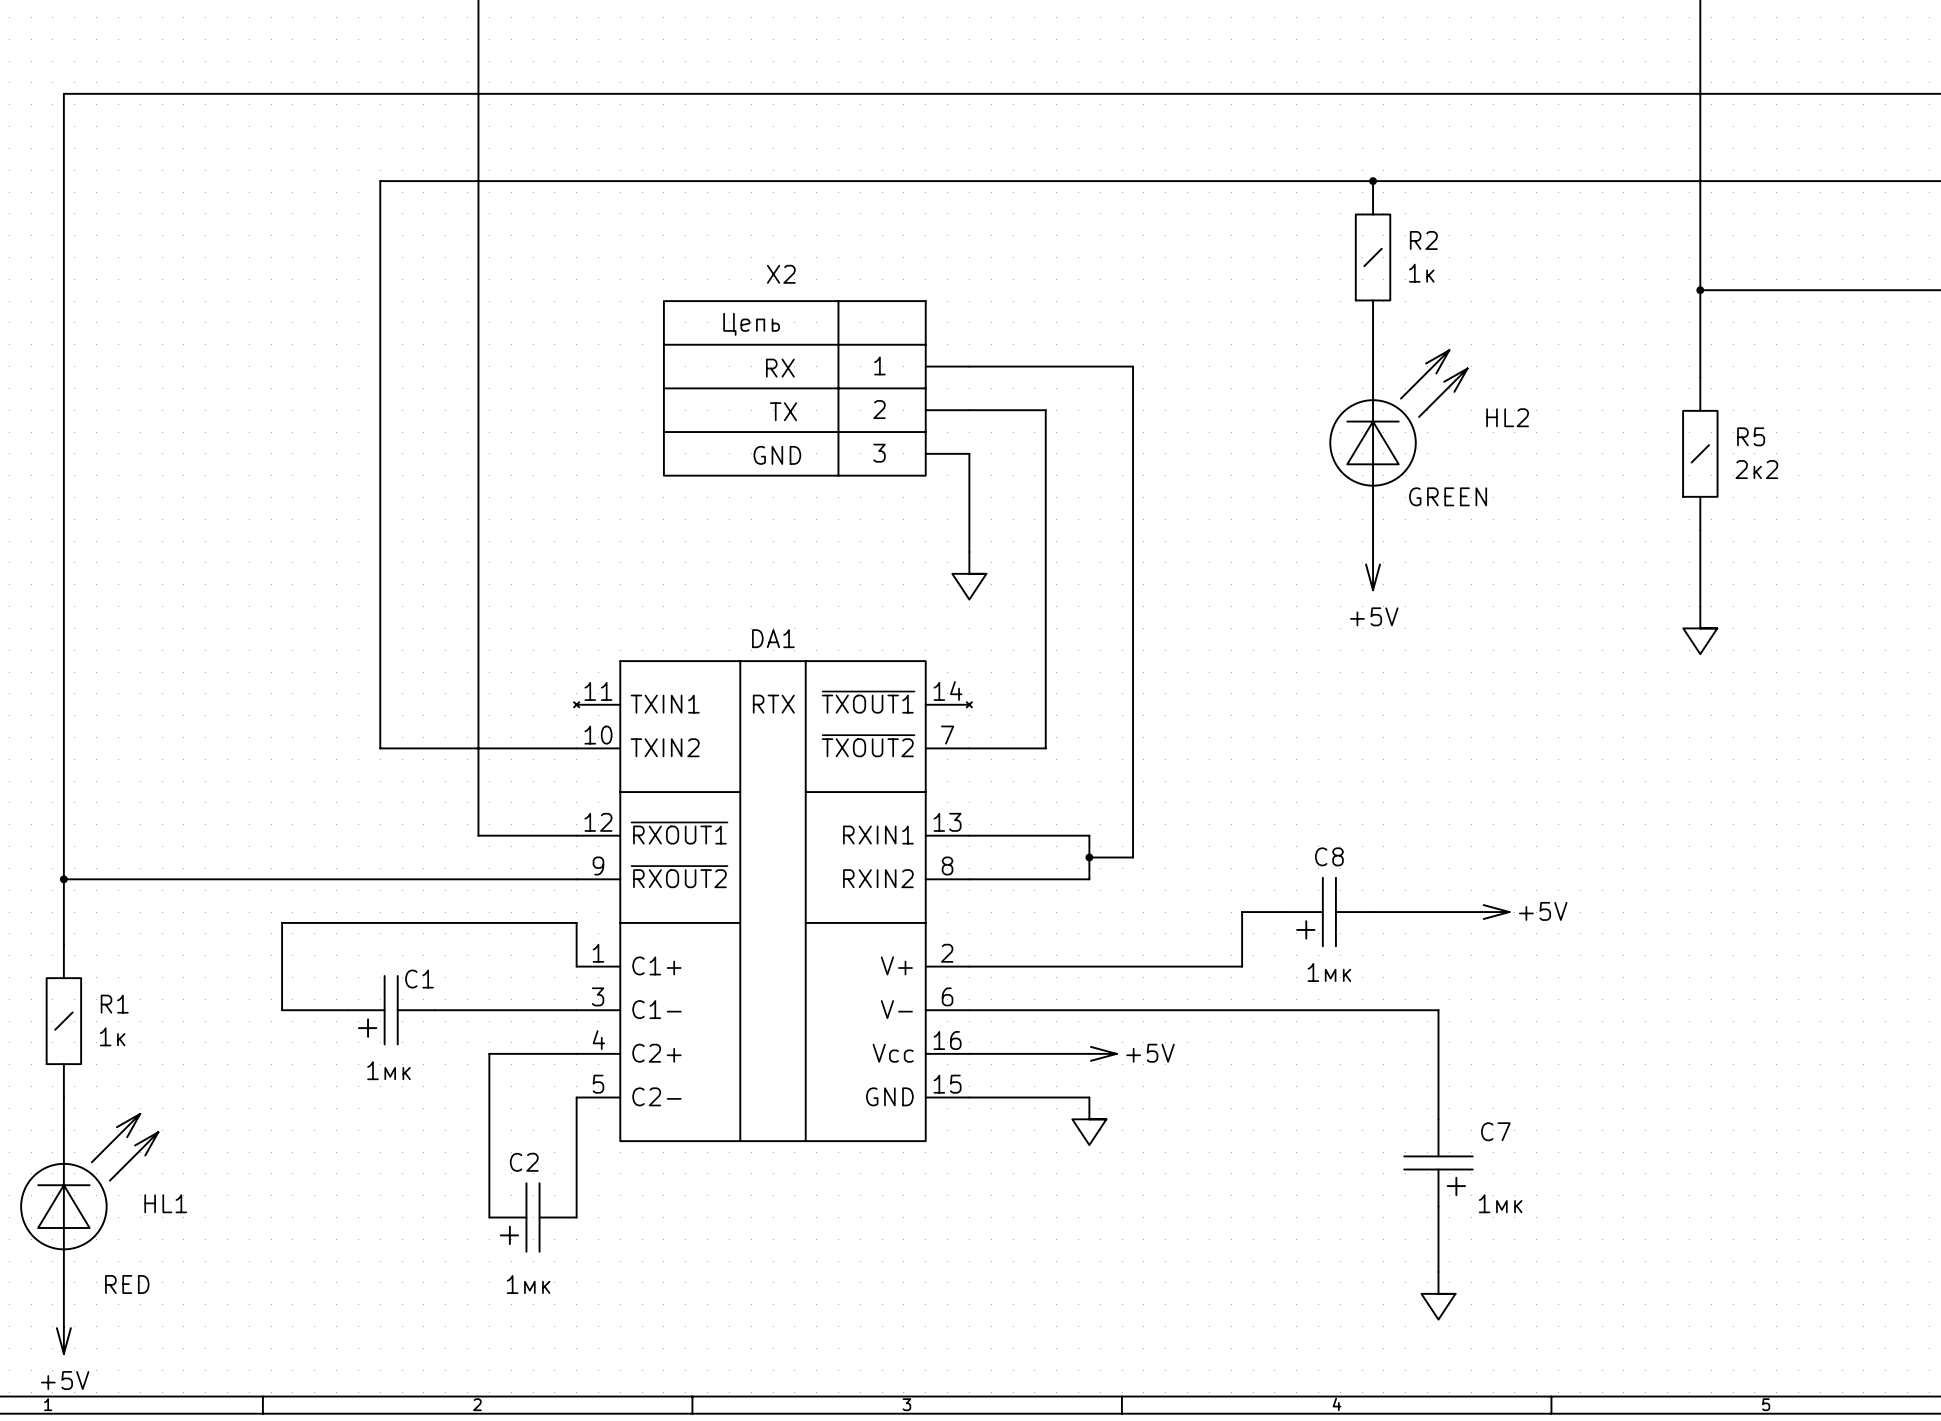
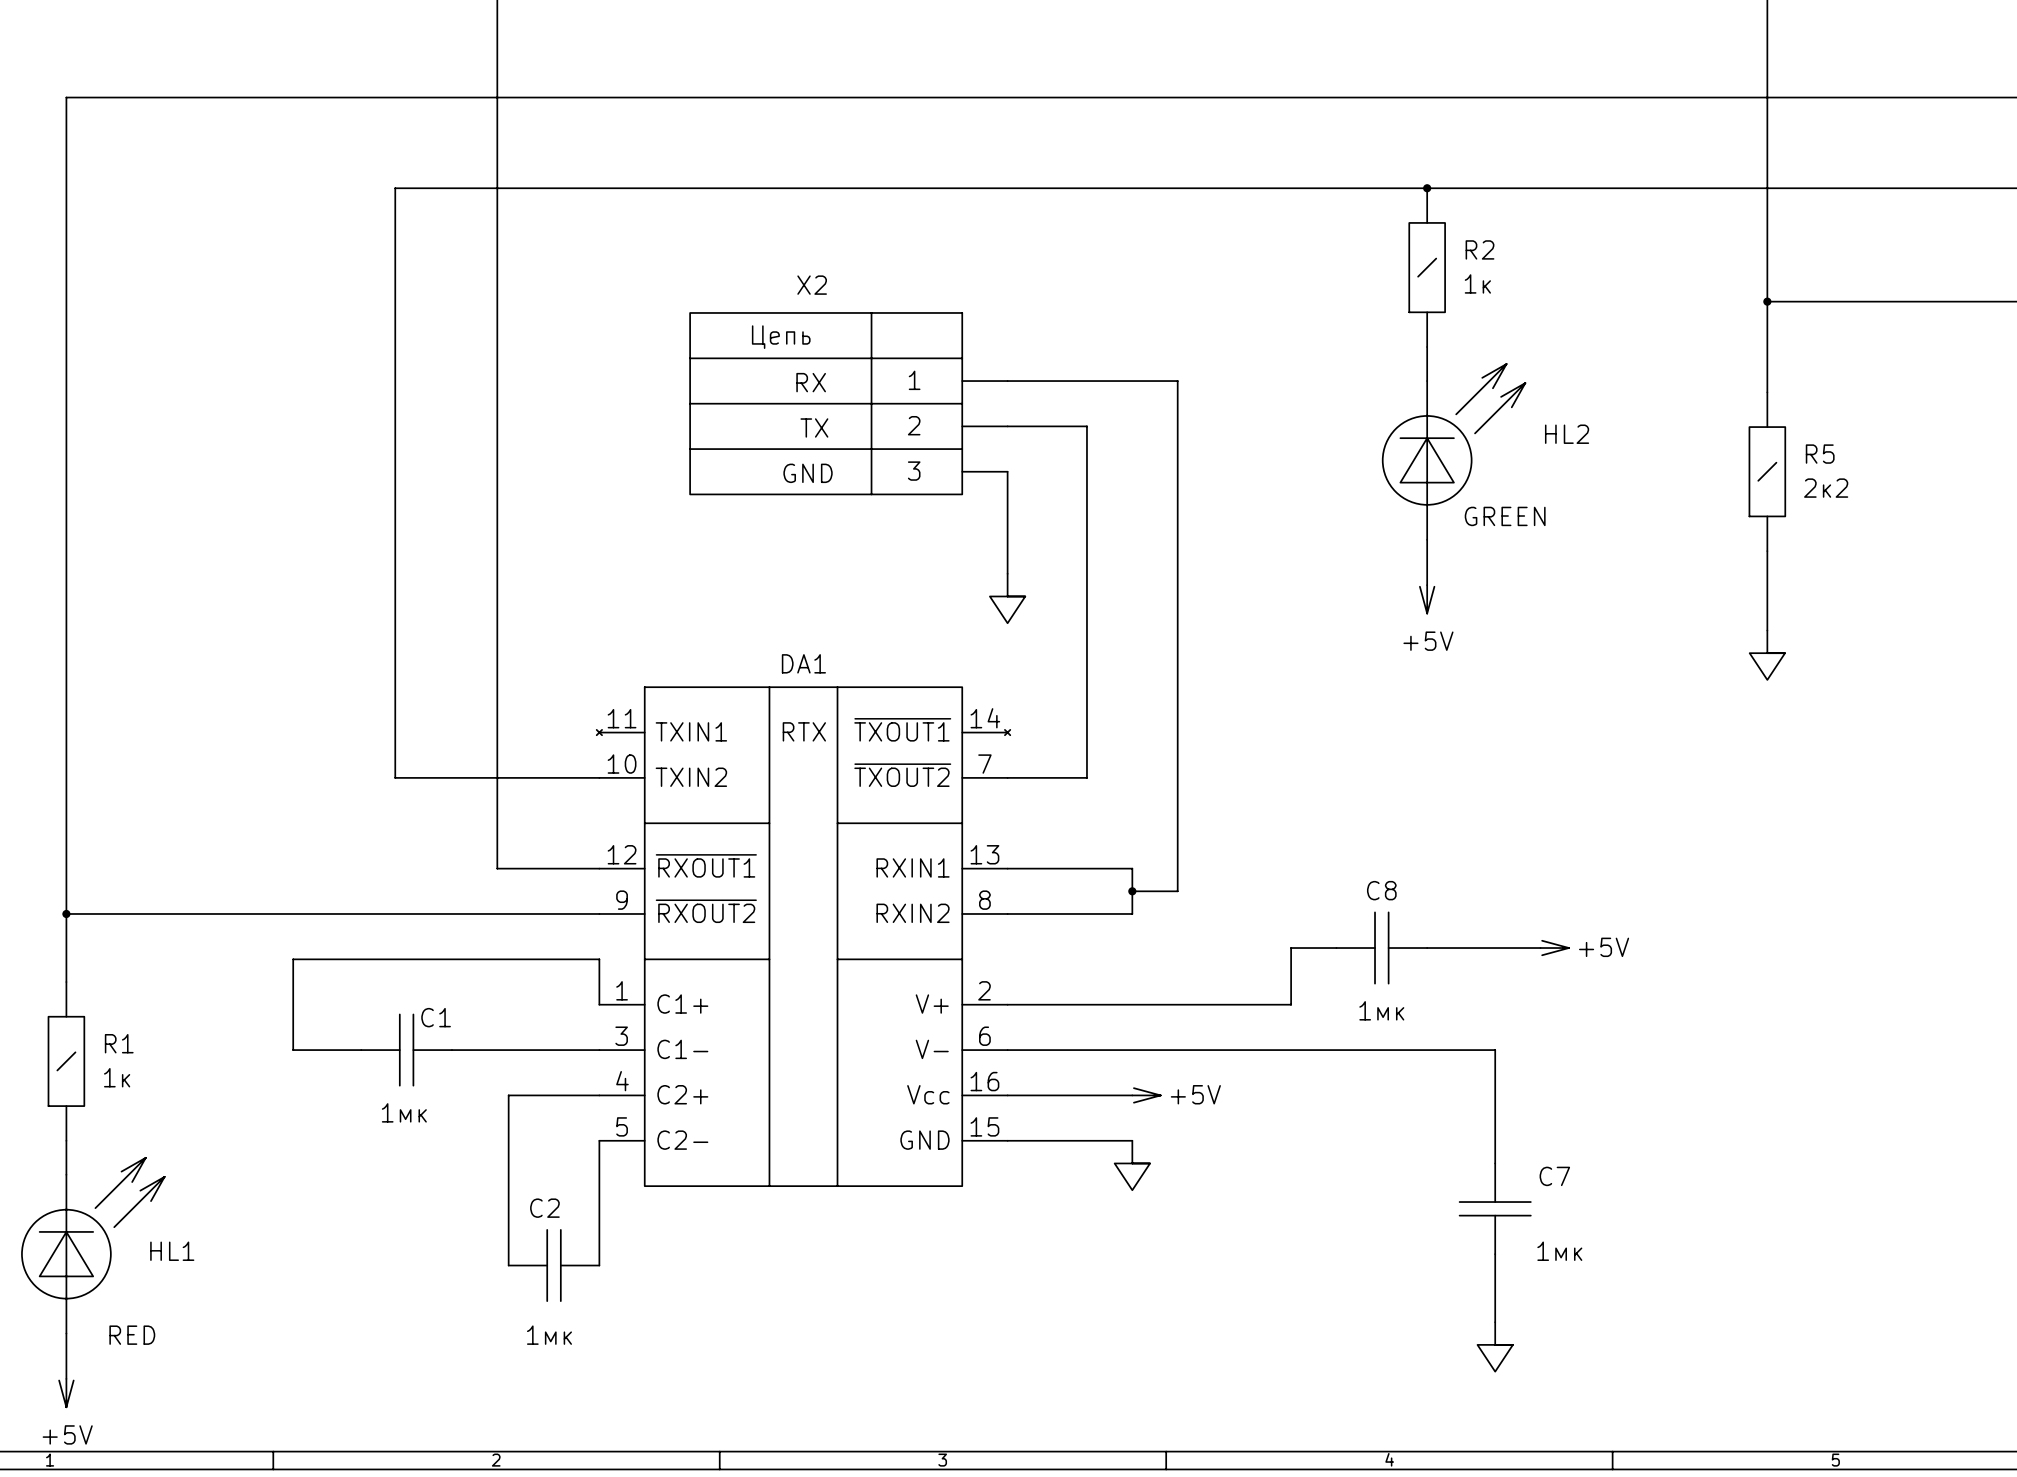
C8 symbol: [1285, 877, 1374, 947] -> [1336, 912, 1428, 984]
C1 symbol: [347, 975, 435, 1045] -> [361, 1014, 452, 1086]
C7 symbol: [1404, 1119, 1473, 1207] -> [1459, 1163, 1531, 1255]
C2 symbol: [489, 1183, 577, 1252] -> [508, 1229, 600, 1302]

